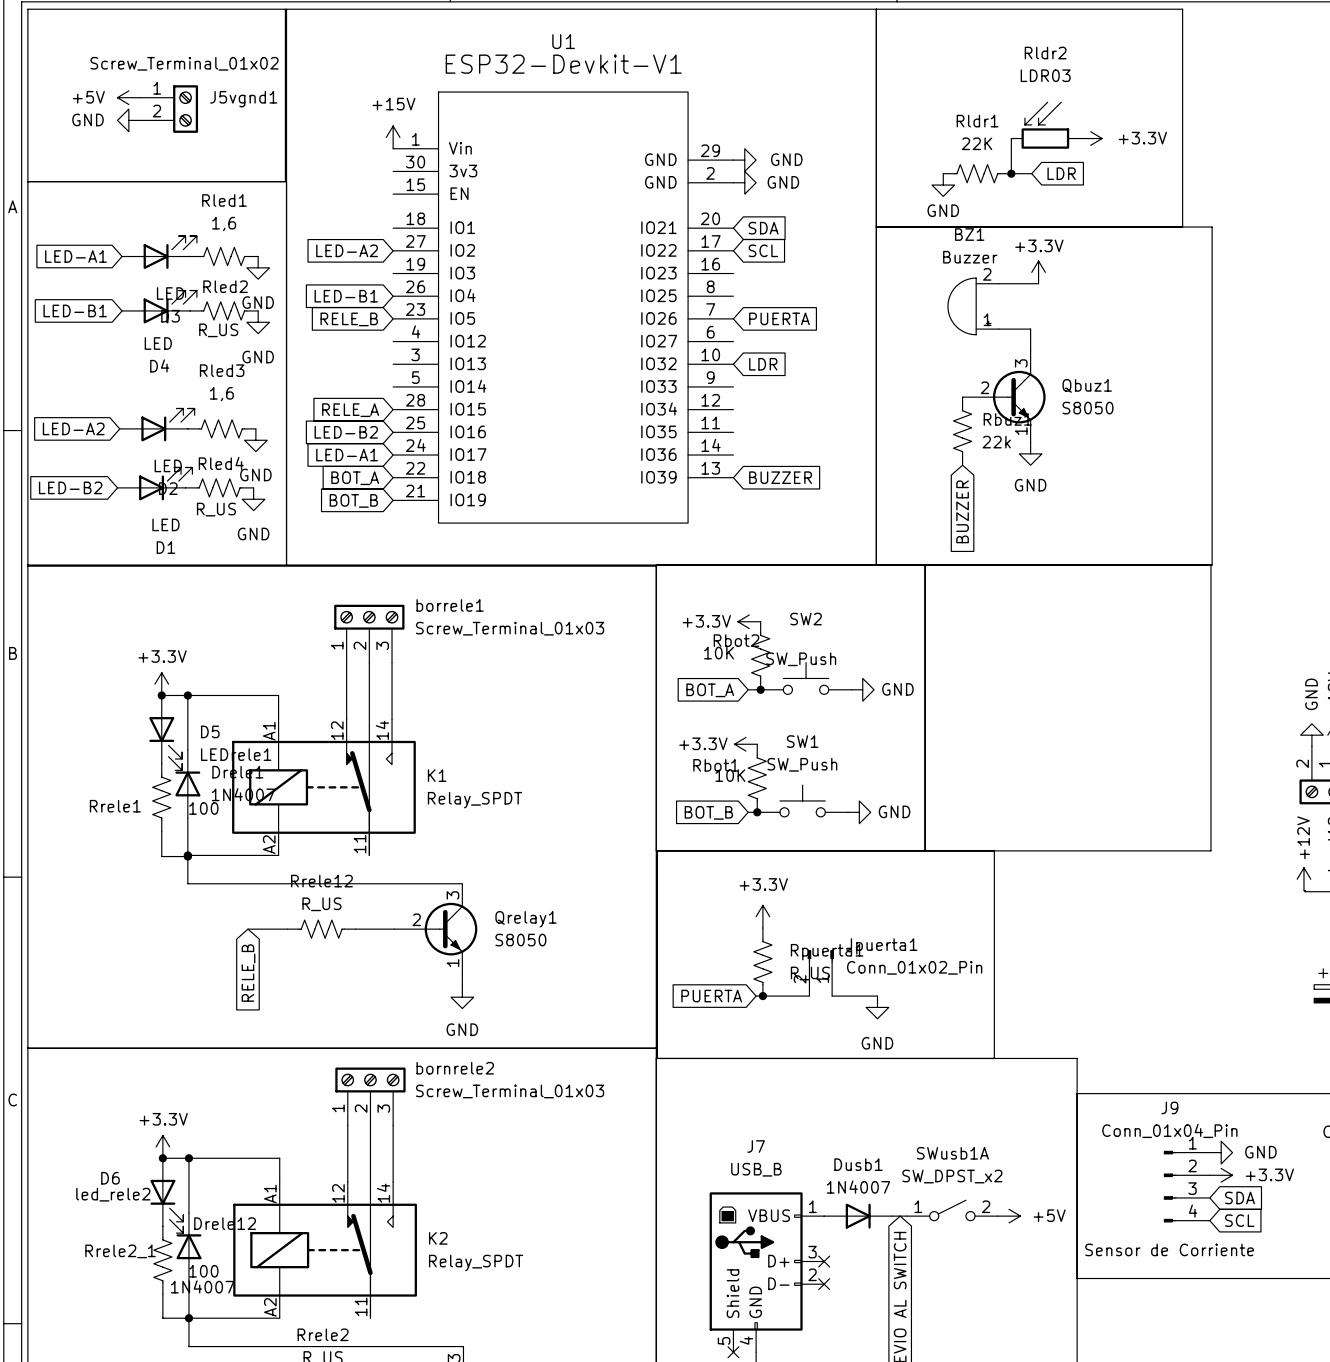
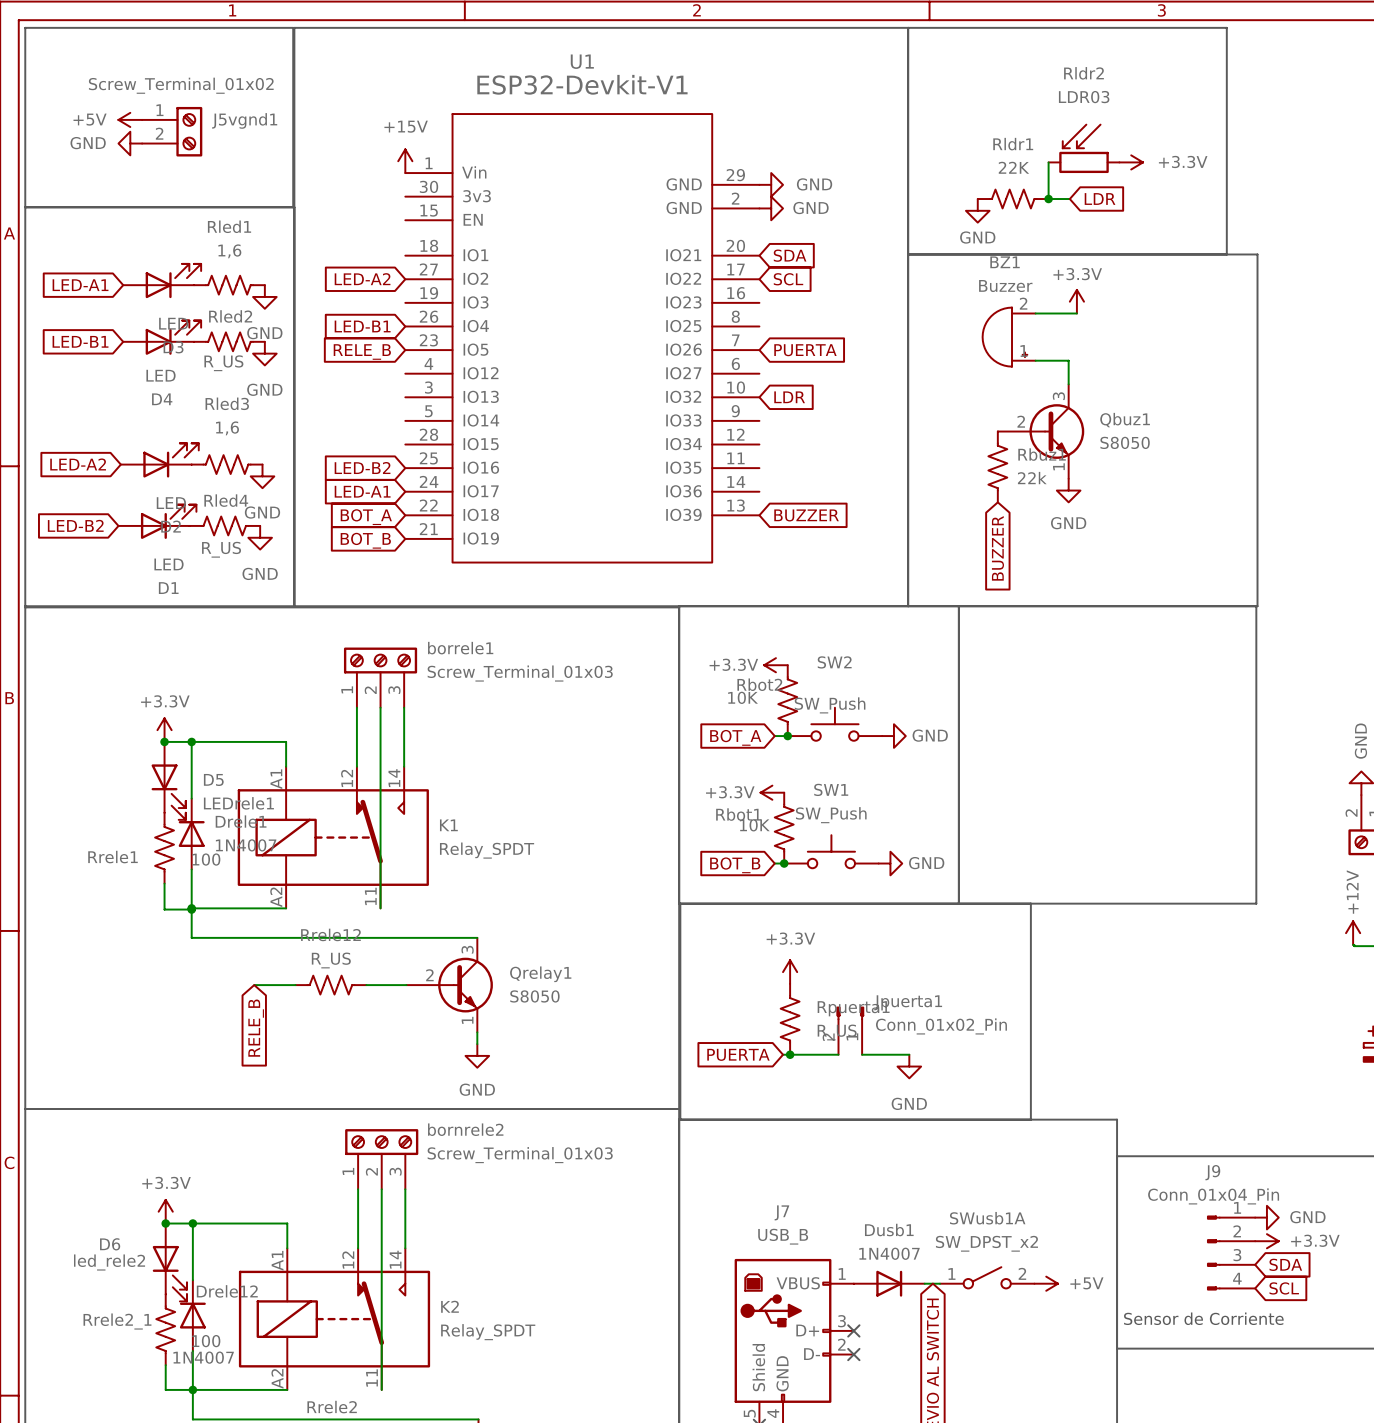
global label: RELE_A (350, 410) -> none

